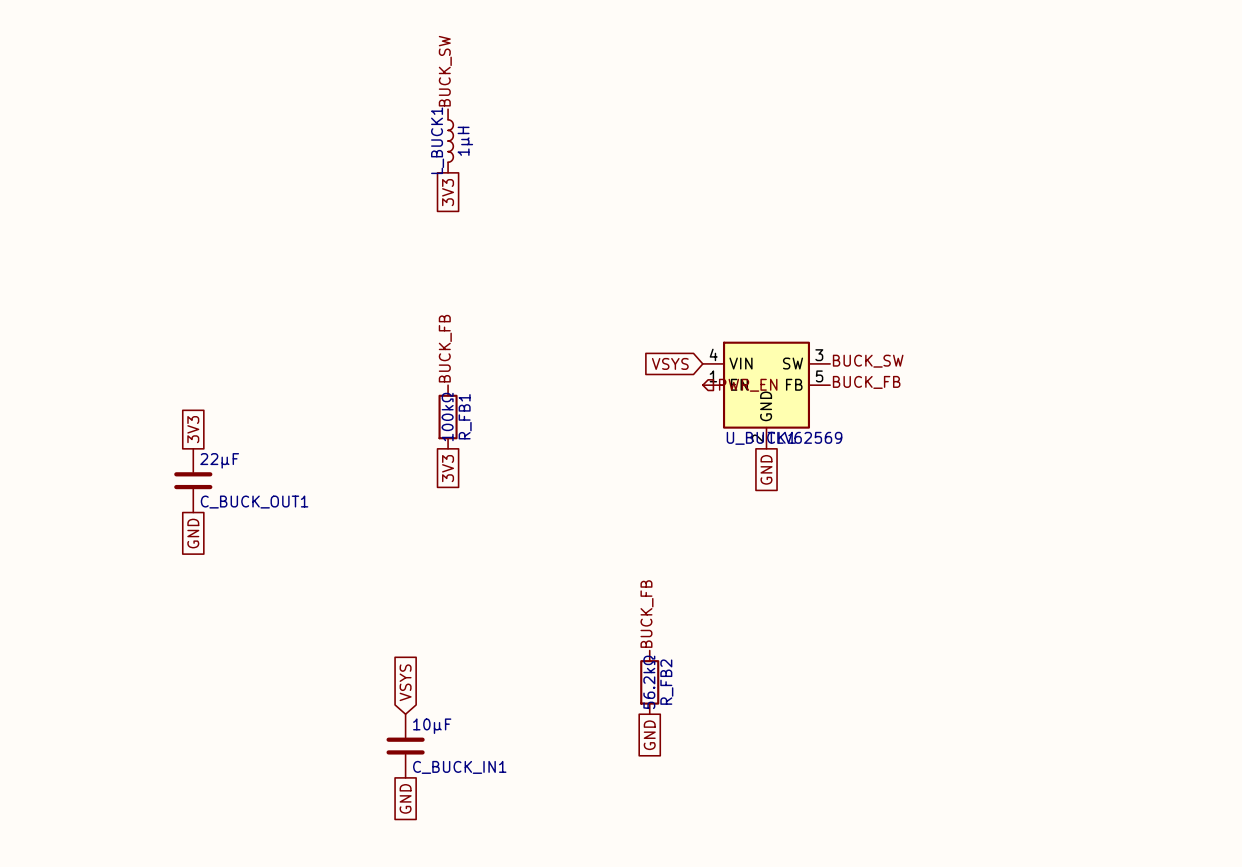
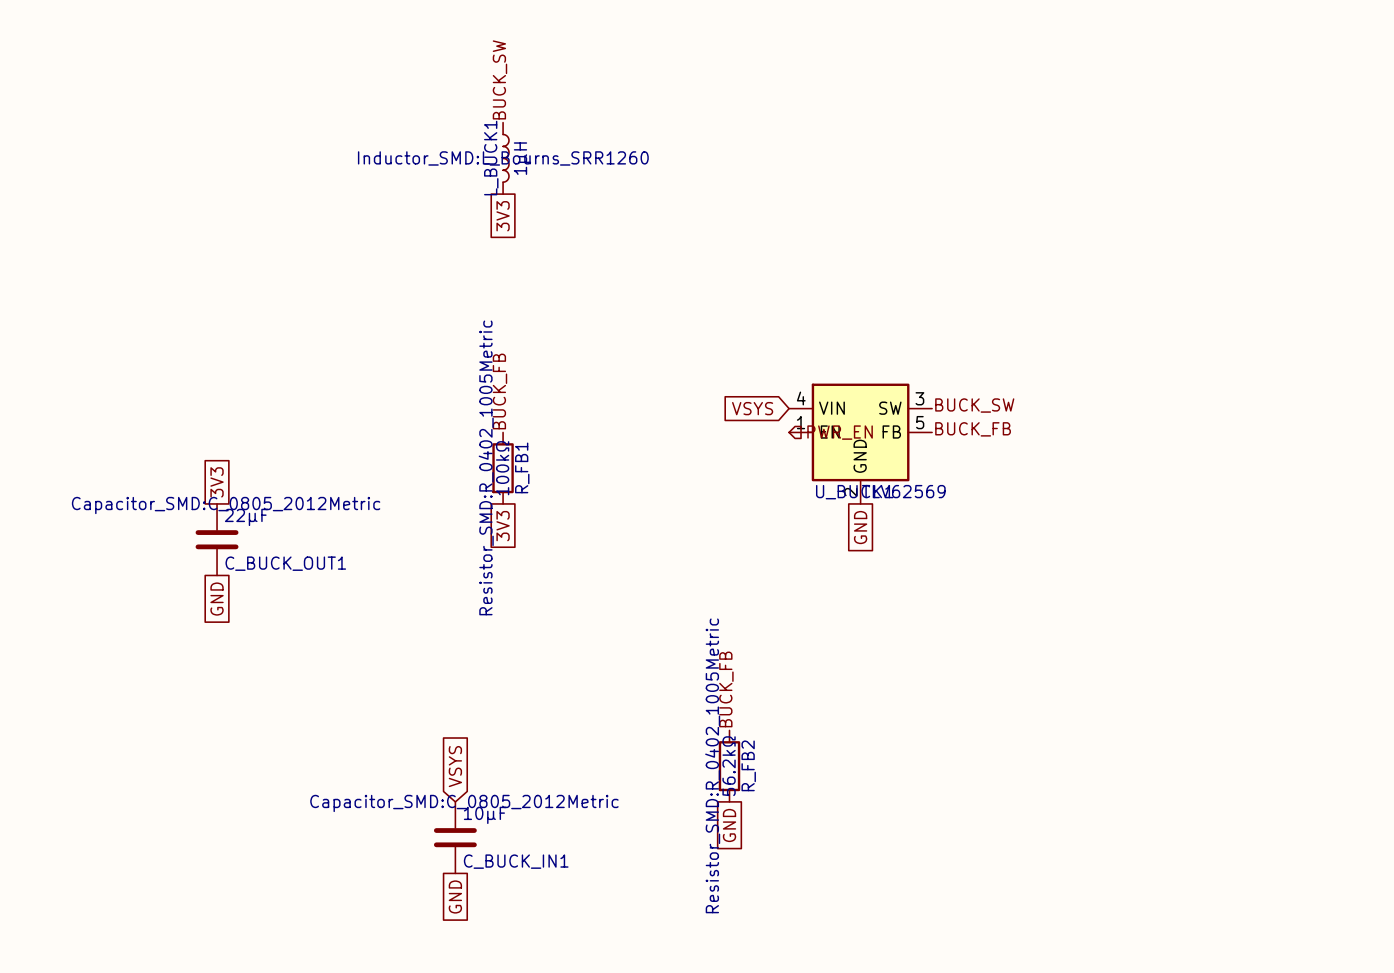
L_BUCK1 text: none -> Inductor_SMD:L_Bourns_SRR1260 (503, 158)
R_FB1 text: none -> Resistor_SMD:R_0402_1005Metric (486, 467)
C_BUCK_OUT1 text: none -> Capacitor_SMD:C_0805_2012Metric (226, 505)
R_FB2 text: none -> Resistor_SMD:R_0402_1005Metric (712, 765)
C_BUCK_IN1 text: none -> Capacitor_SMD:C_0805_2012Metric (464, 803)

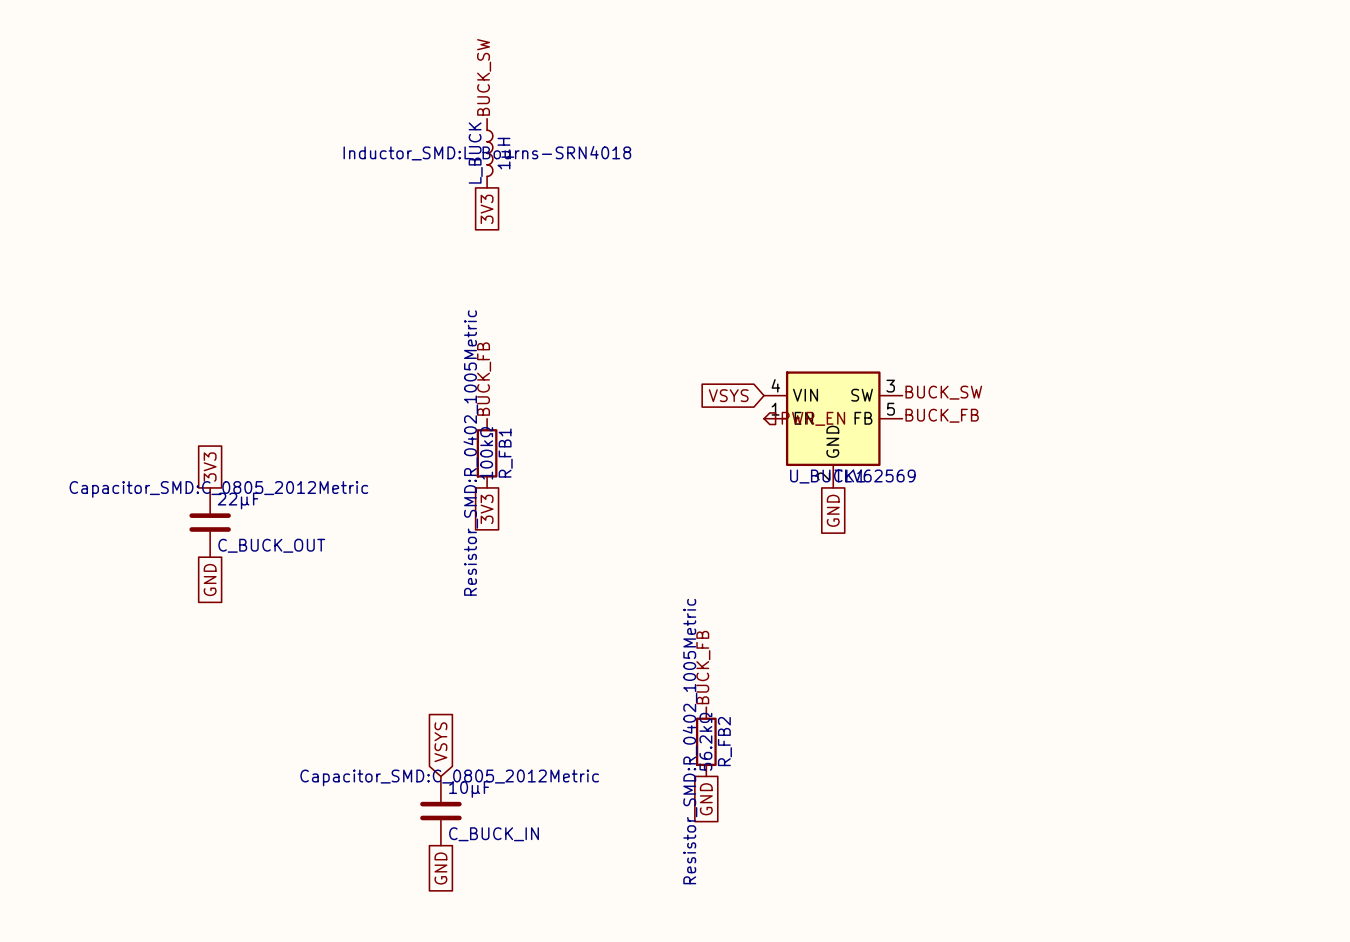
L_BUCK1 name: L_BUCK1 (491, 158) -> L_BUCK (475, 153)
L_BUCK1 text: Inductor_SMD:L_Bourns_SRR1260 (503, 158) -> Inductor_SMD:L_Bourns-SRN4018 (487, 153)
C_BUCK_OUT1 name: C_BUCK_OUT1 (285, 563) -> C_BUCK_OUT (271, 545)
C_BUCK_IN1 name: C_BUCK_IN1 (516, 861) -> C_BUCK_IN (494, 834)

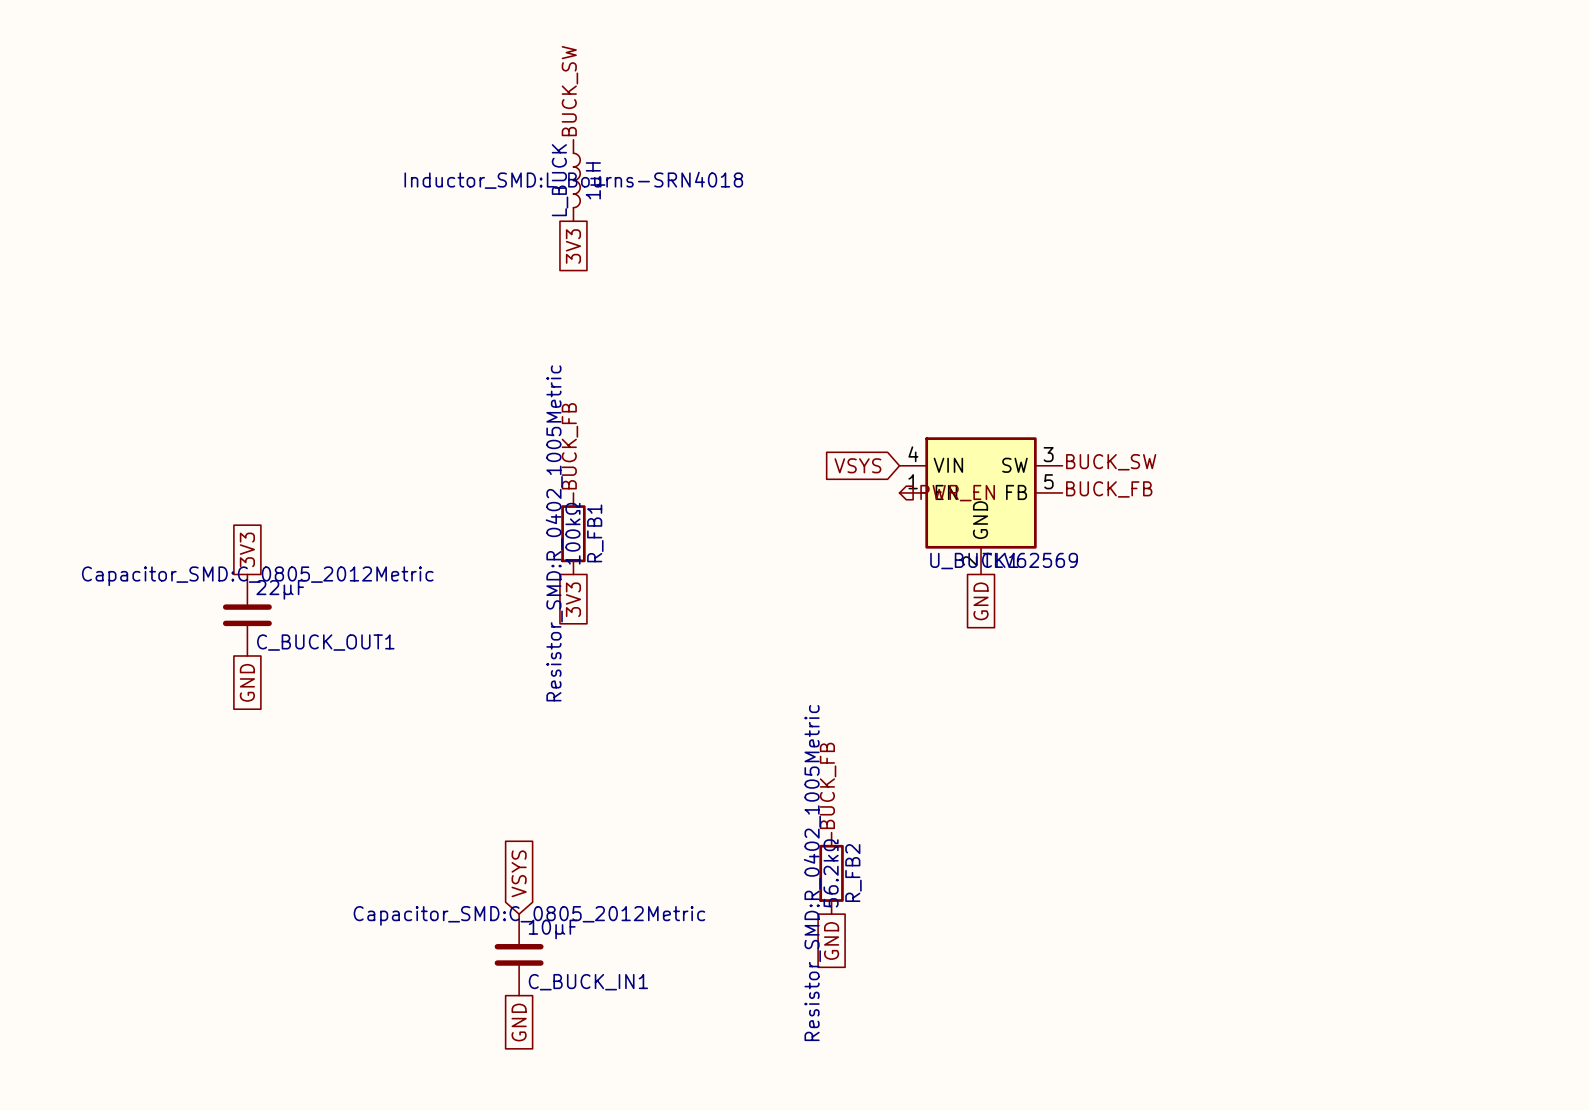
C_BUCK_OUT name: C_BUCK_OUT (271, 545) -> C_BUCK_OUT1 (325, 642)
C_BUCK_IN name: C_BUCK_IN (494, 834) -> C_BUCK_IN1 (588, 982)

